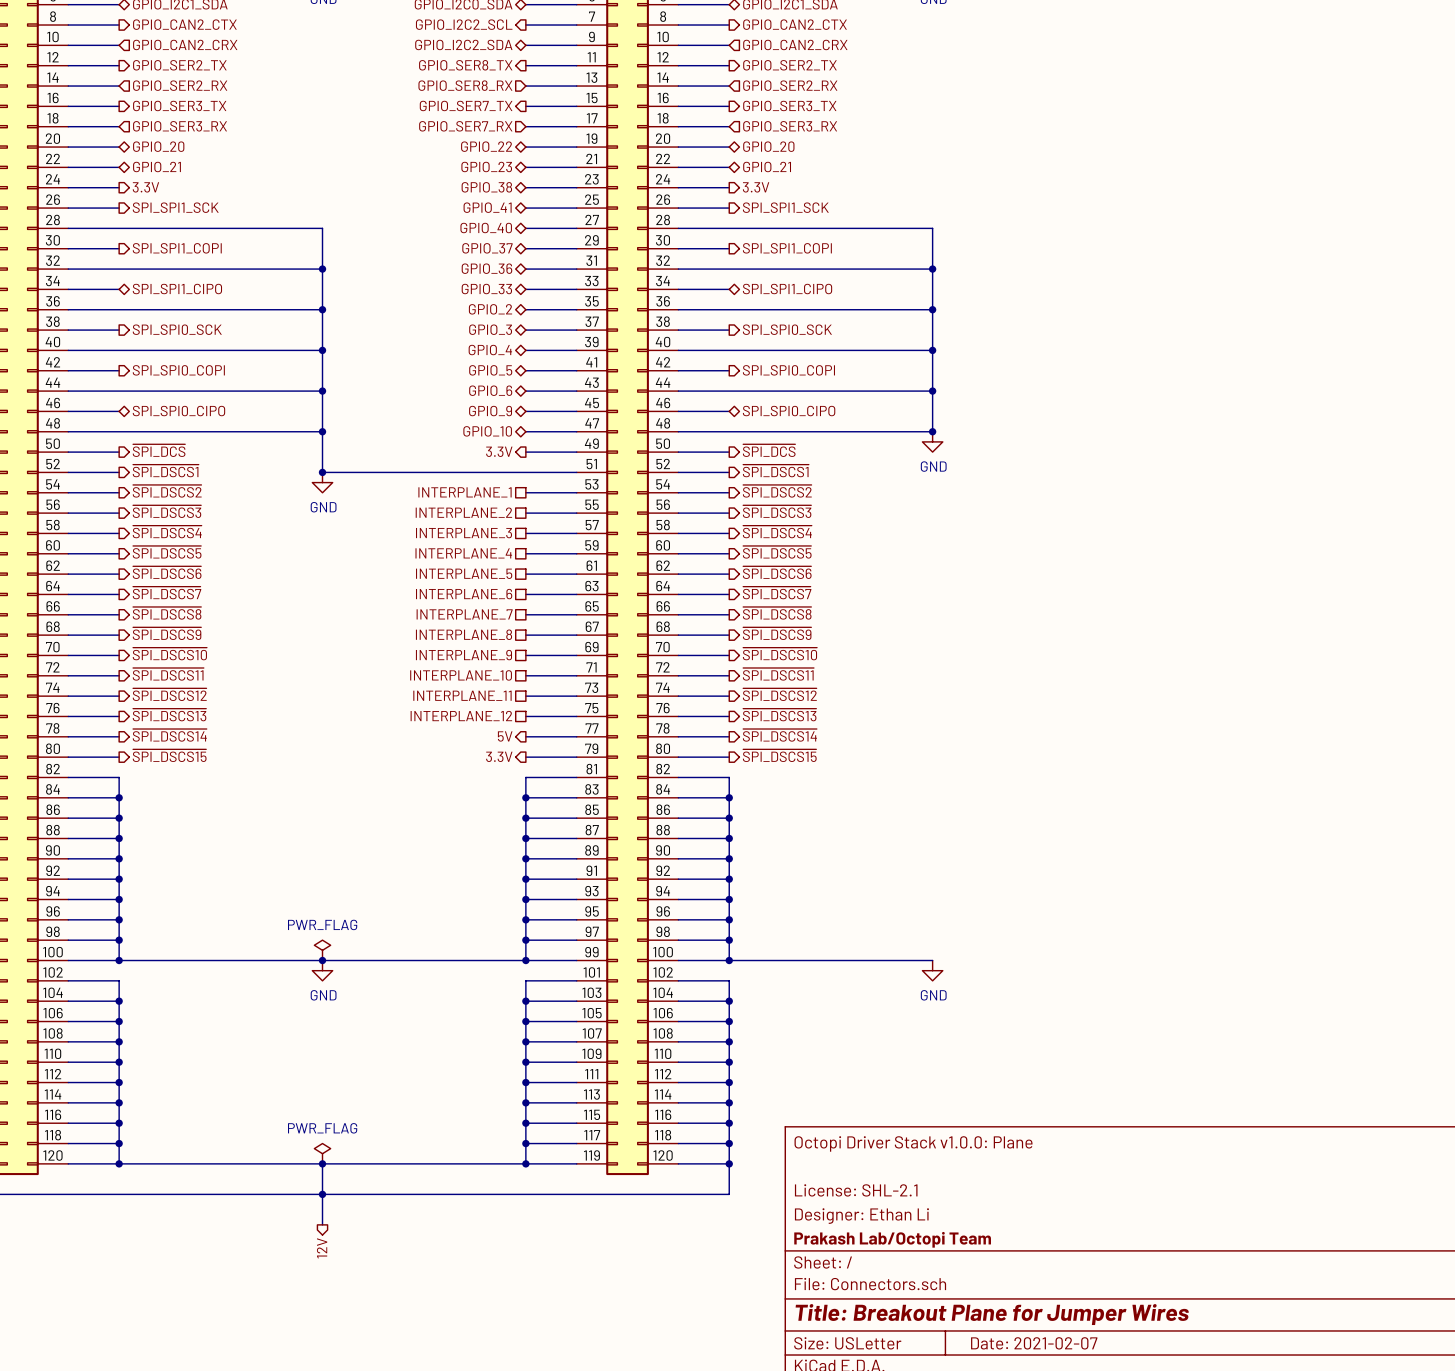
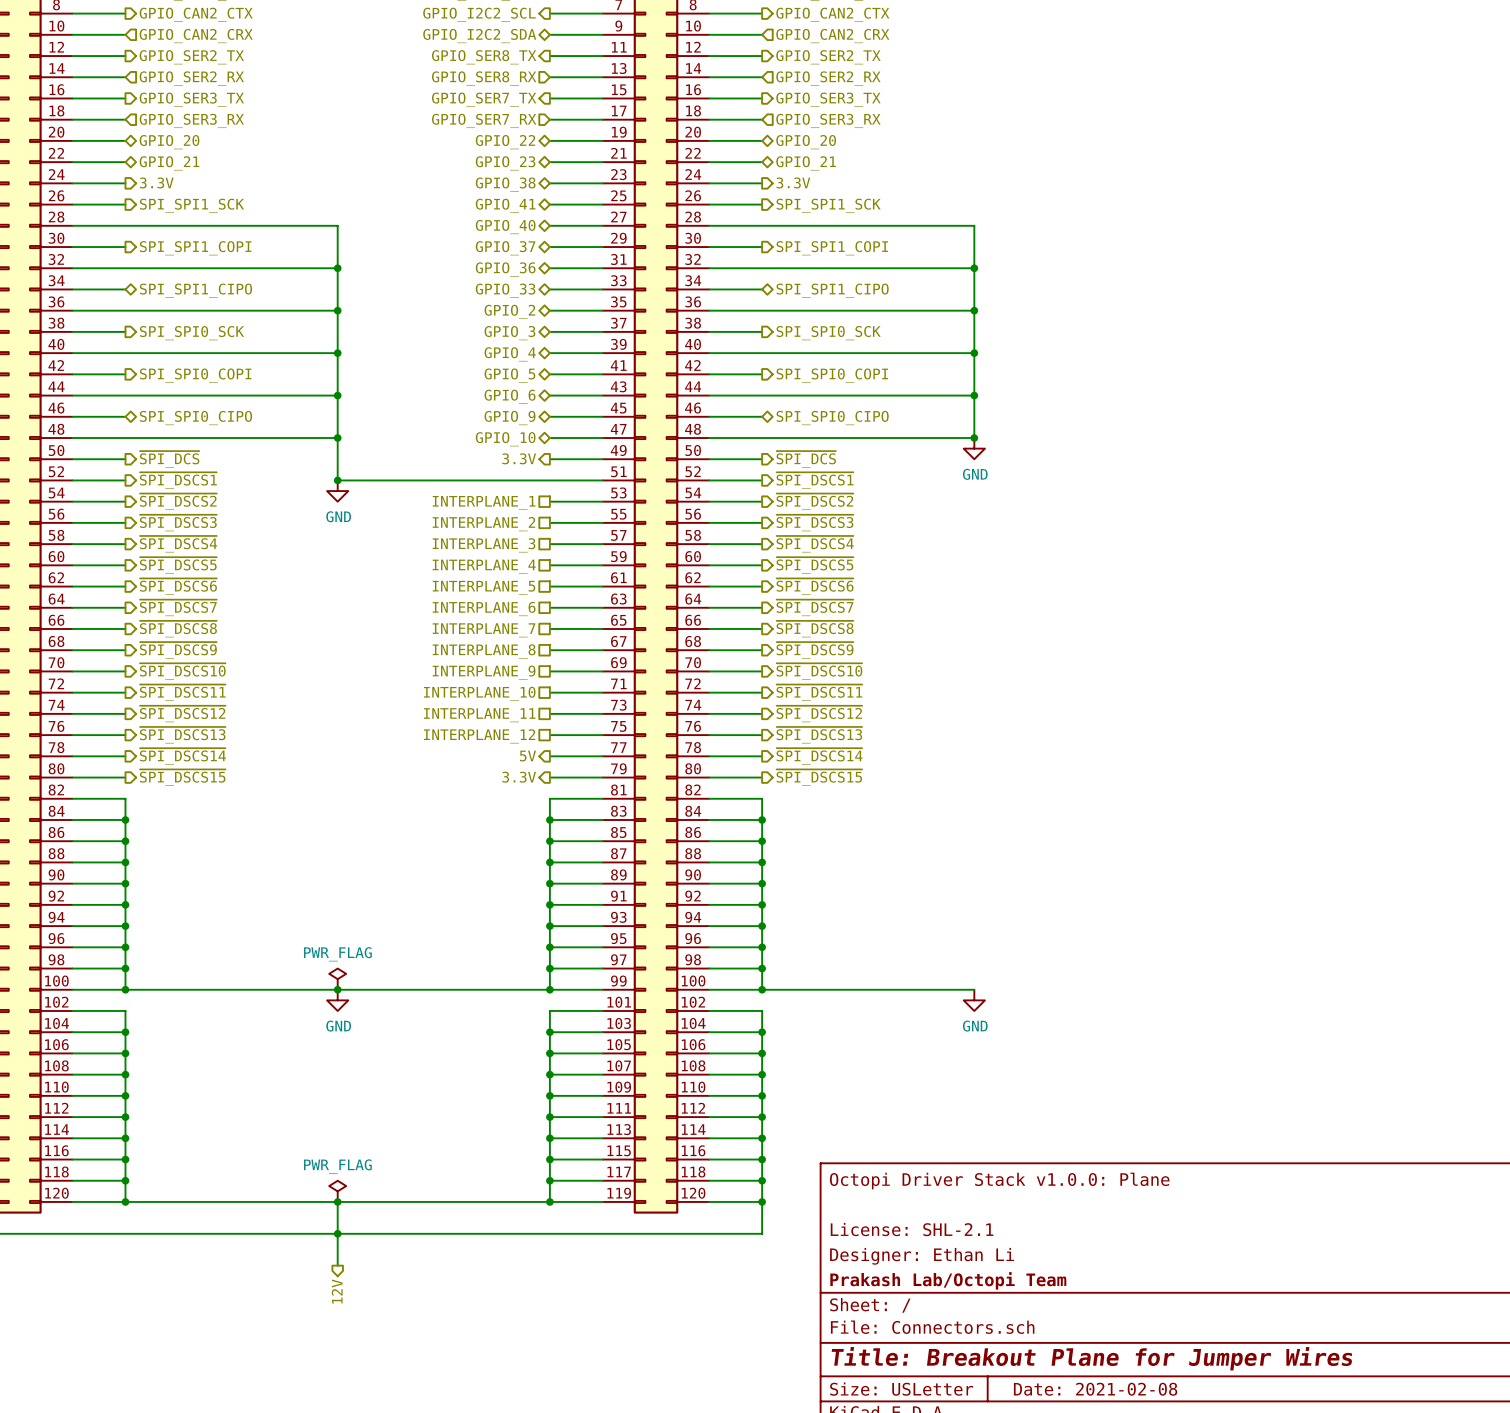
title block: Date: 2021-02-07 (1034, 1343) -> Date: 2021-02-08 (1095, 1389)

